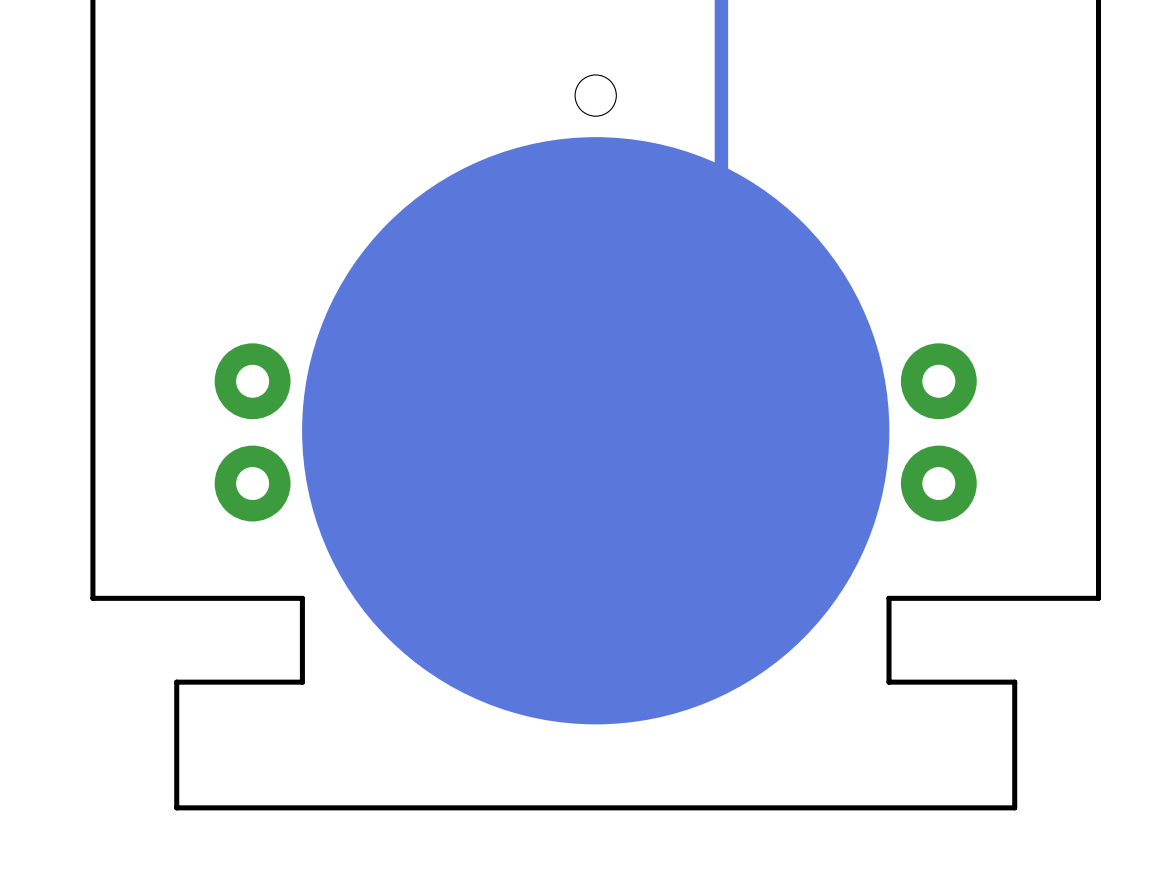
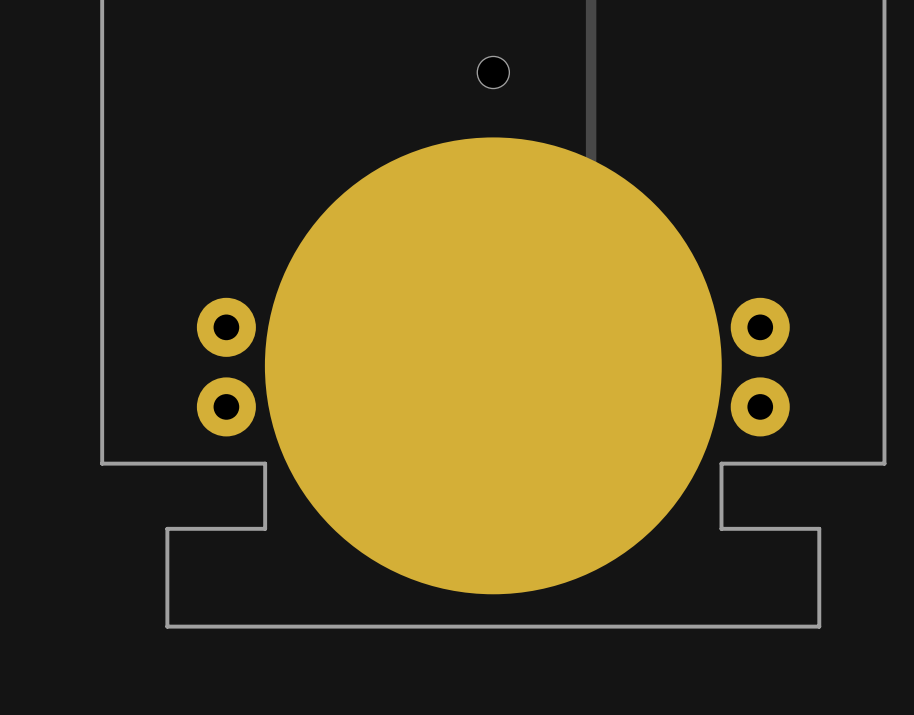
part position: (595, 430) -> (493, 365)

